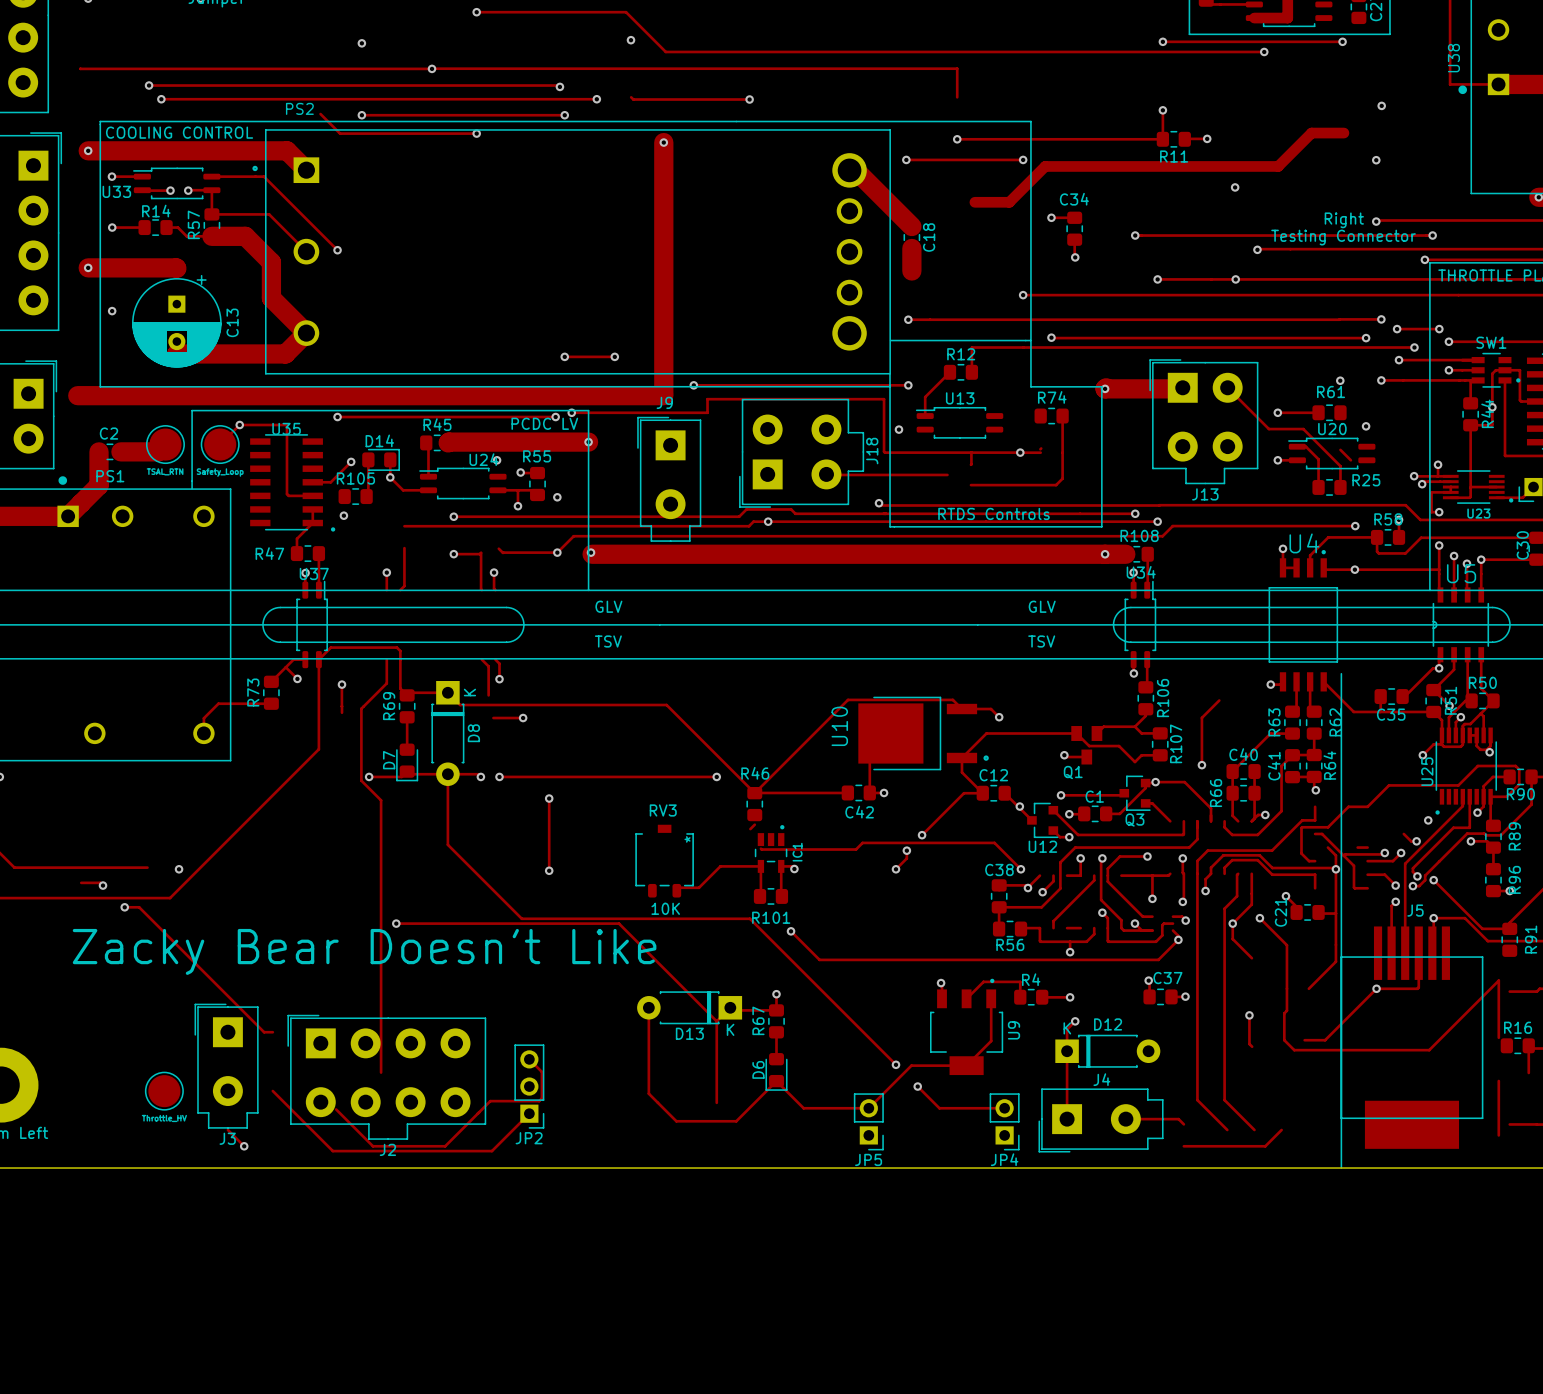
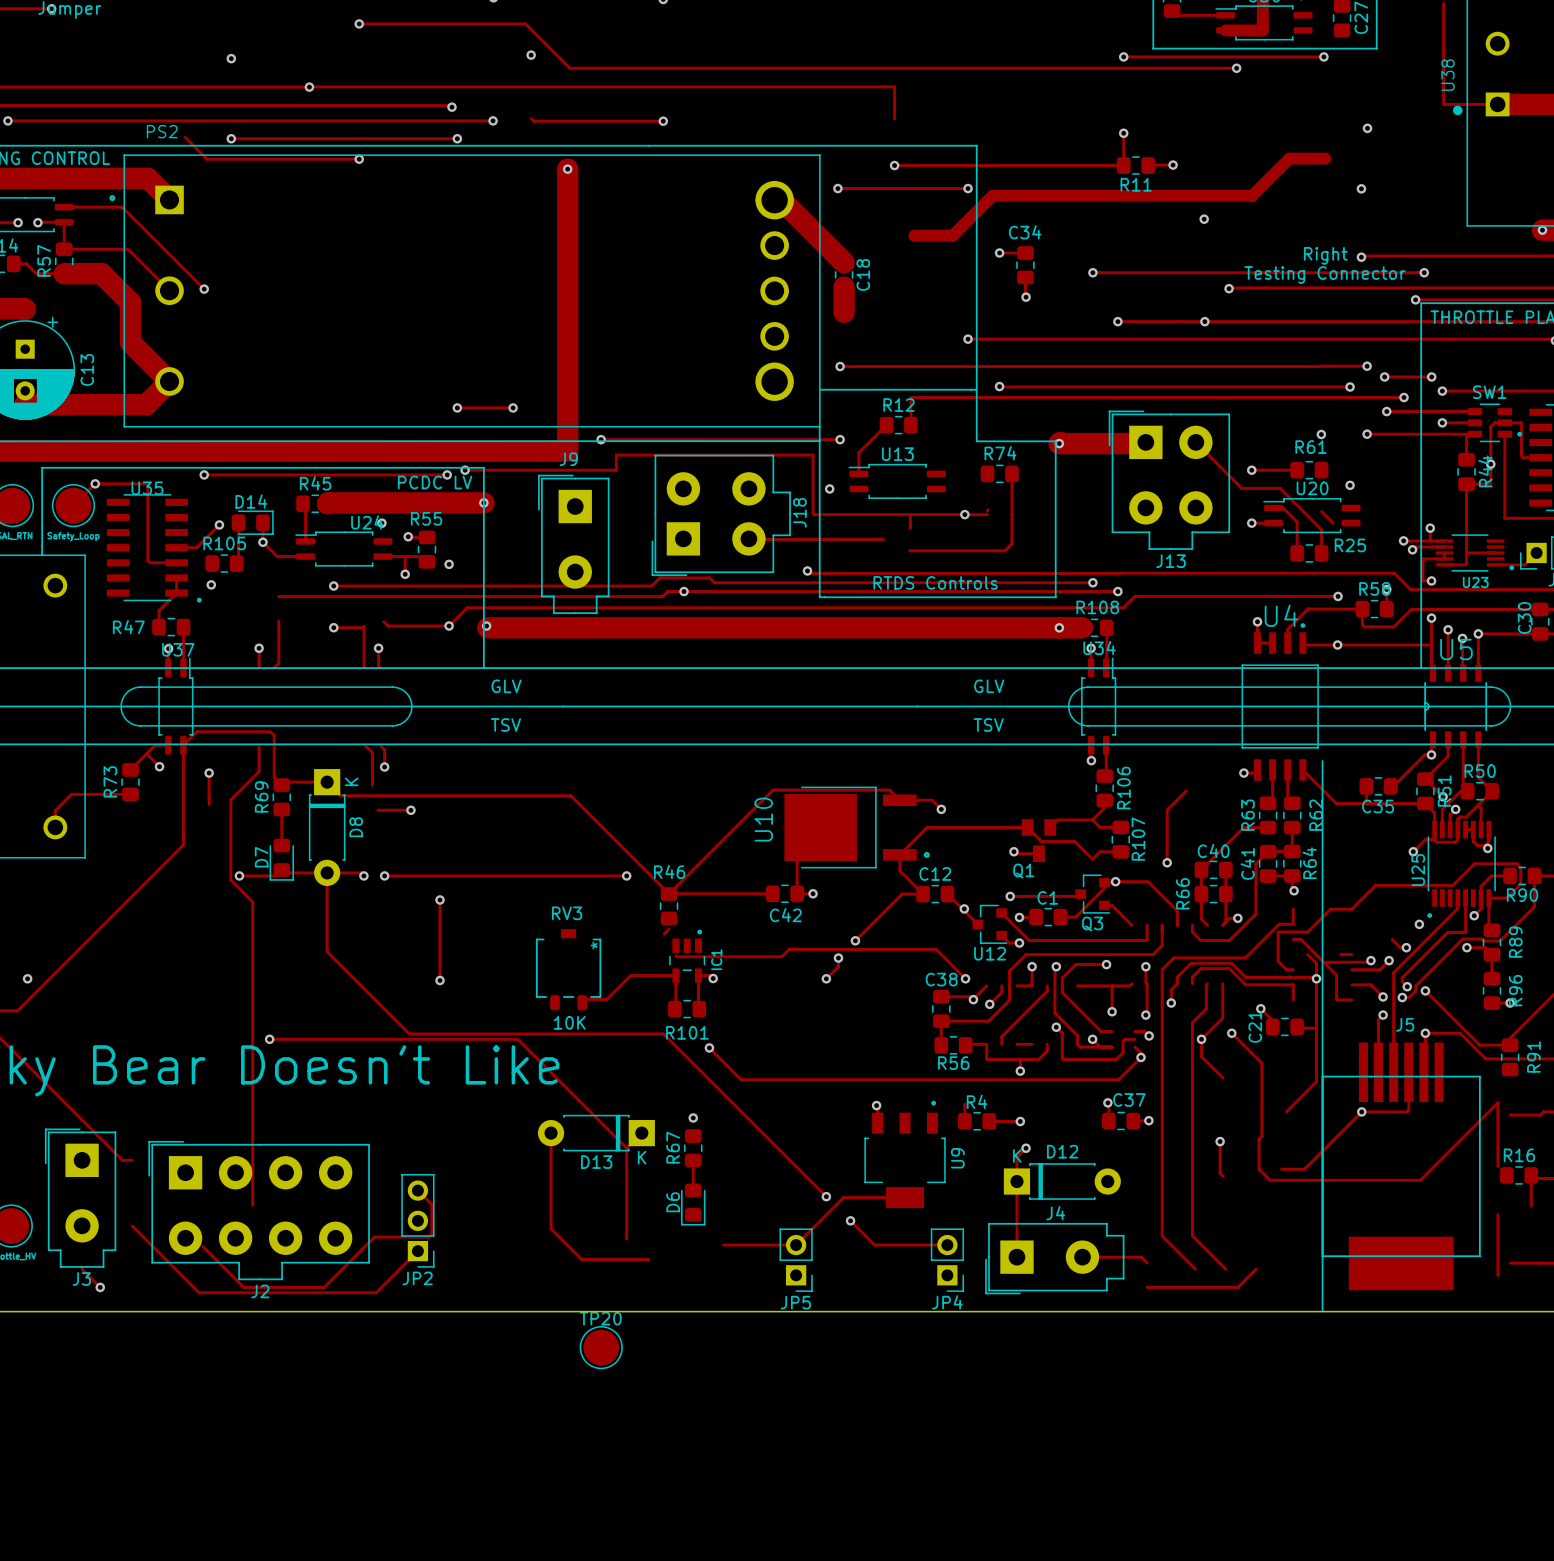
track: (1020, 981) (983, 981) (966, 998) -> none
track: (776, 994) (776, 1010) (732, 1010) -> none
track: (991, 998) (991, 1041) (966, 1065) -> none
track: (803, 1108) (776, 1081) (736, 1121) -> none
TP20: none -> (601, 1347)

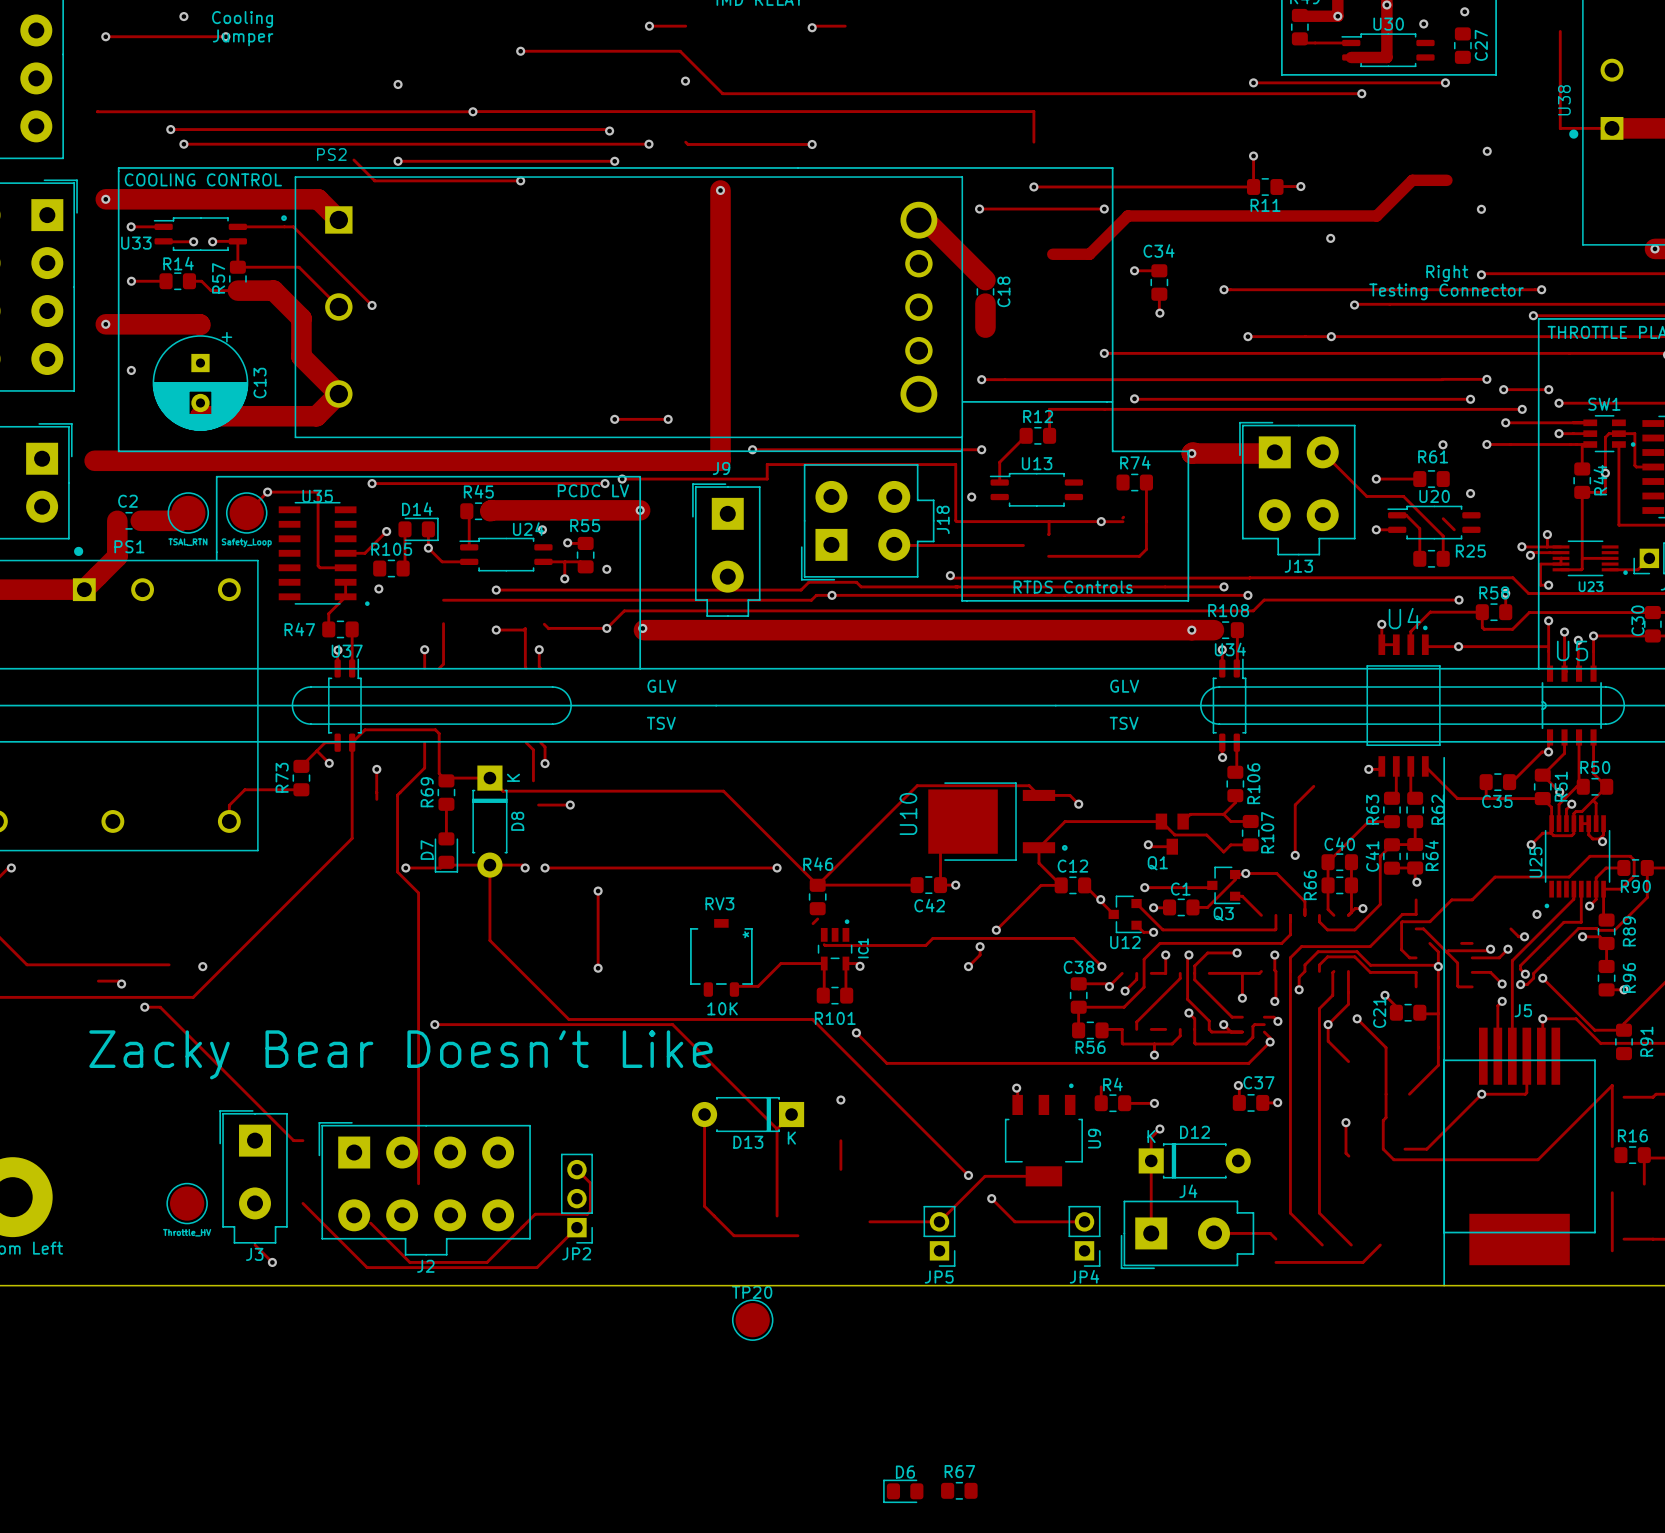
R67 rotation: 0° (693, 1148) -> 90° clockwise (959, 1490)
R67 position: (693, 1148) -> (959, 1490)
D6 rotation: 0° (693, 1204) -> 90° clockwise (903, 1491)
D6 position: (693, 1204) -> (903, 1491)

